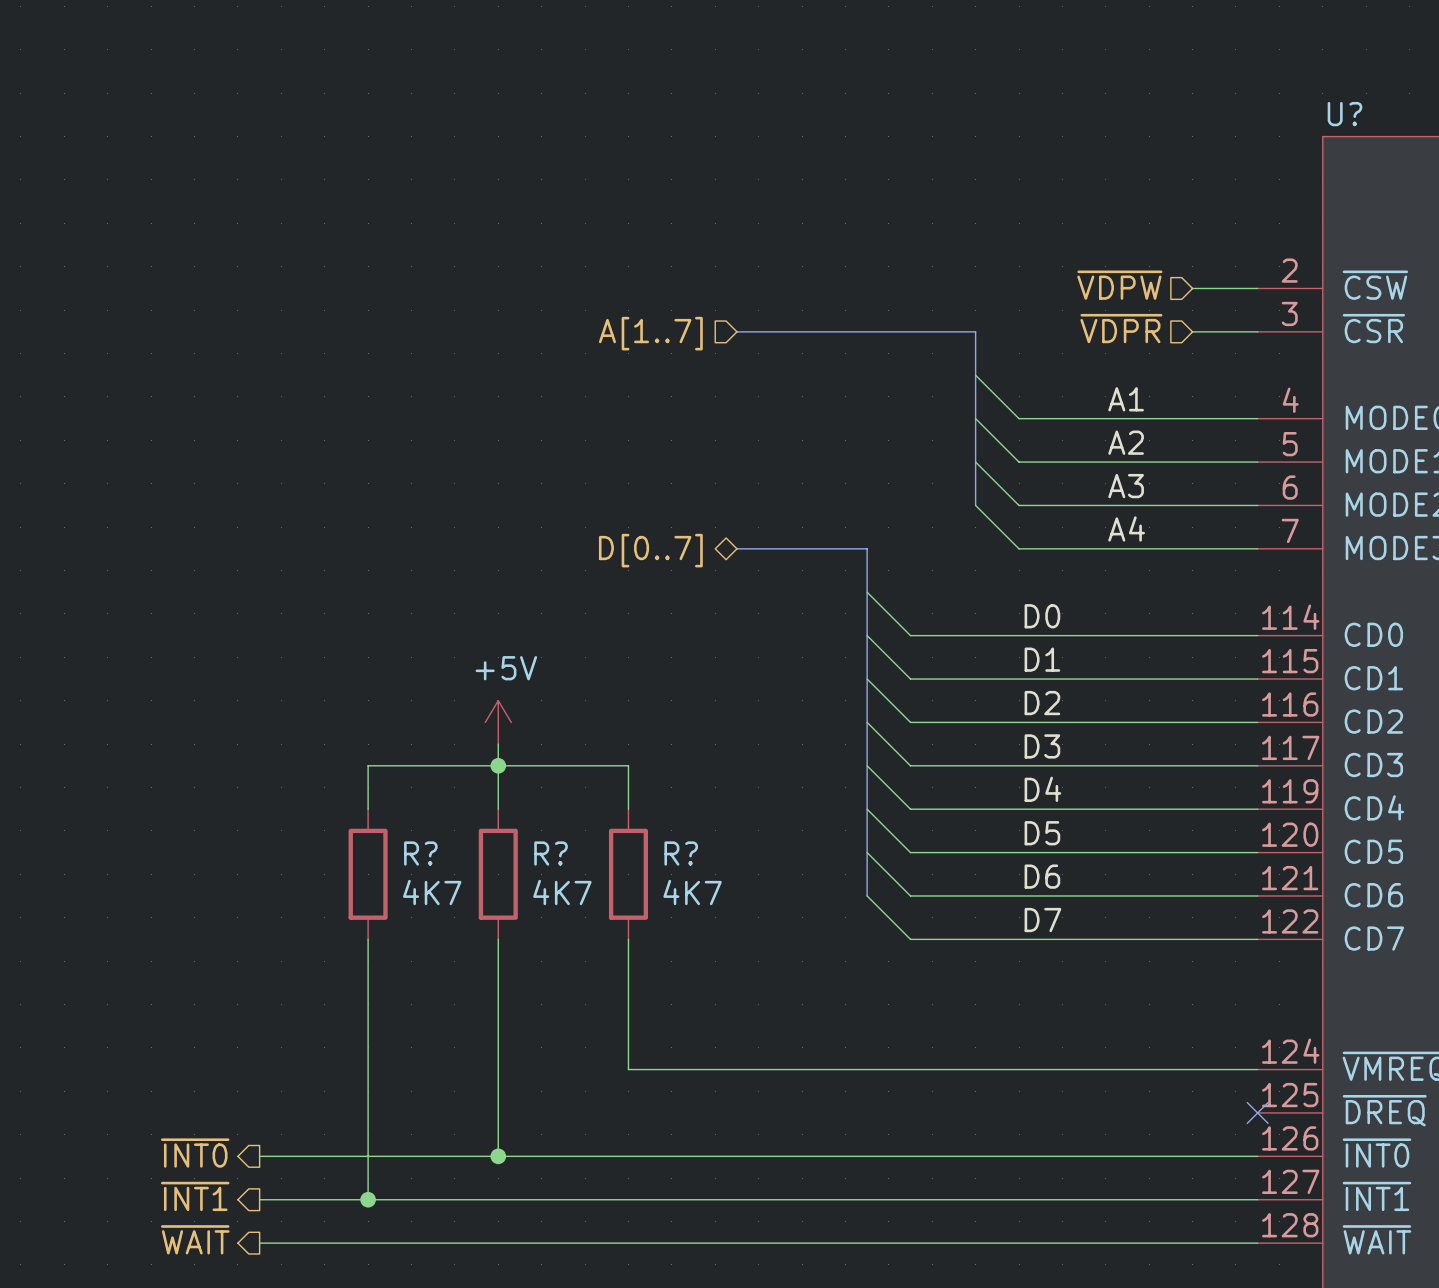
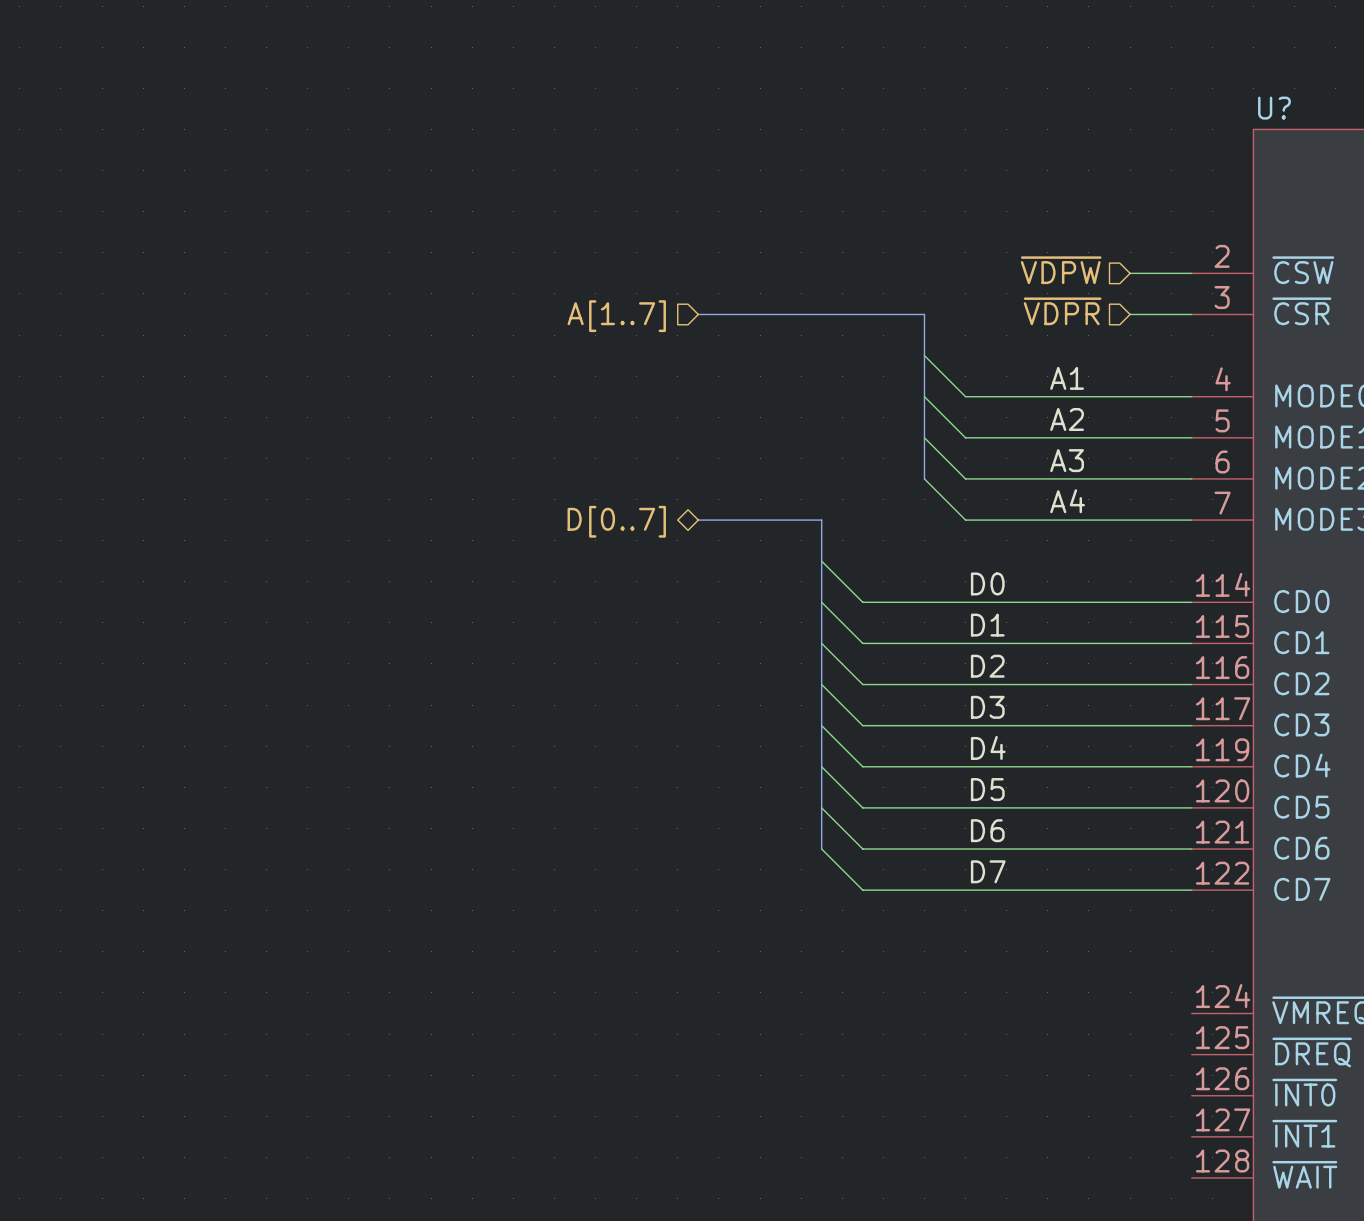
power symbol: +5V (498, 722) -> none
wire: (498, 744) (498, 809) -> none
junction: (498, 765) -> none
wire: (368, 809) (368, 765) (628, 765) (628, 809) -> none
R?: 4K7 (368, 874) -> none
R?: 4K7 (498, 874) -> none
R?: 4K7 (628, 874) -> none
wire: (368, 939) (368, 1199) -> none
wire: (498, 939) (498, 1156) -> none
wire: (628, 939) (628, 1069) (1257, 1069) -> none
no-connect mark: (1257, 1112) -> none
hierarchical label: ~{INT0} (195, 1153) -> none
wire: (259, 1156) (1257, 1156) -> none
junction: (498, 1156) -> none
hierarchical label: ~{INT1} (195, 1196) -> none
wire: (259, 1199) (1257, 1199) -> none
junction: (368, 1199) -> none
hierarchical label: ~{WAIT} (195, 1239) -> none
wire: (259, 1243) (1257, 1243) -> none

